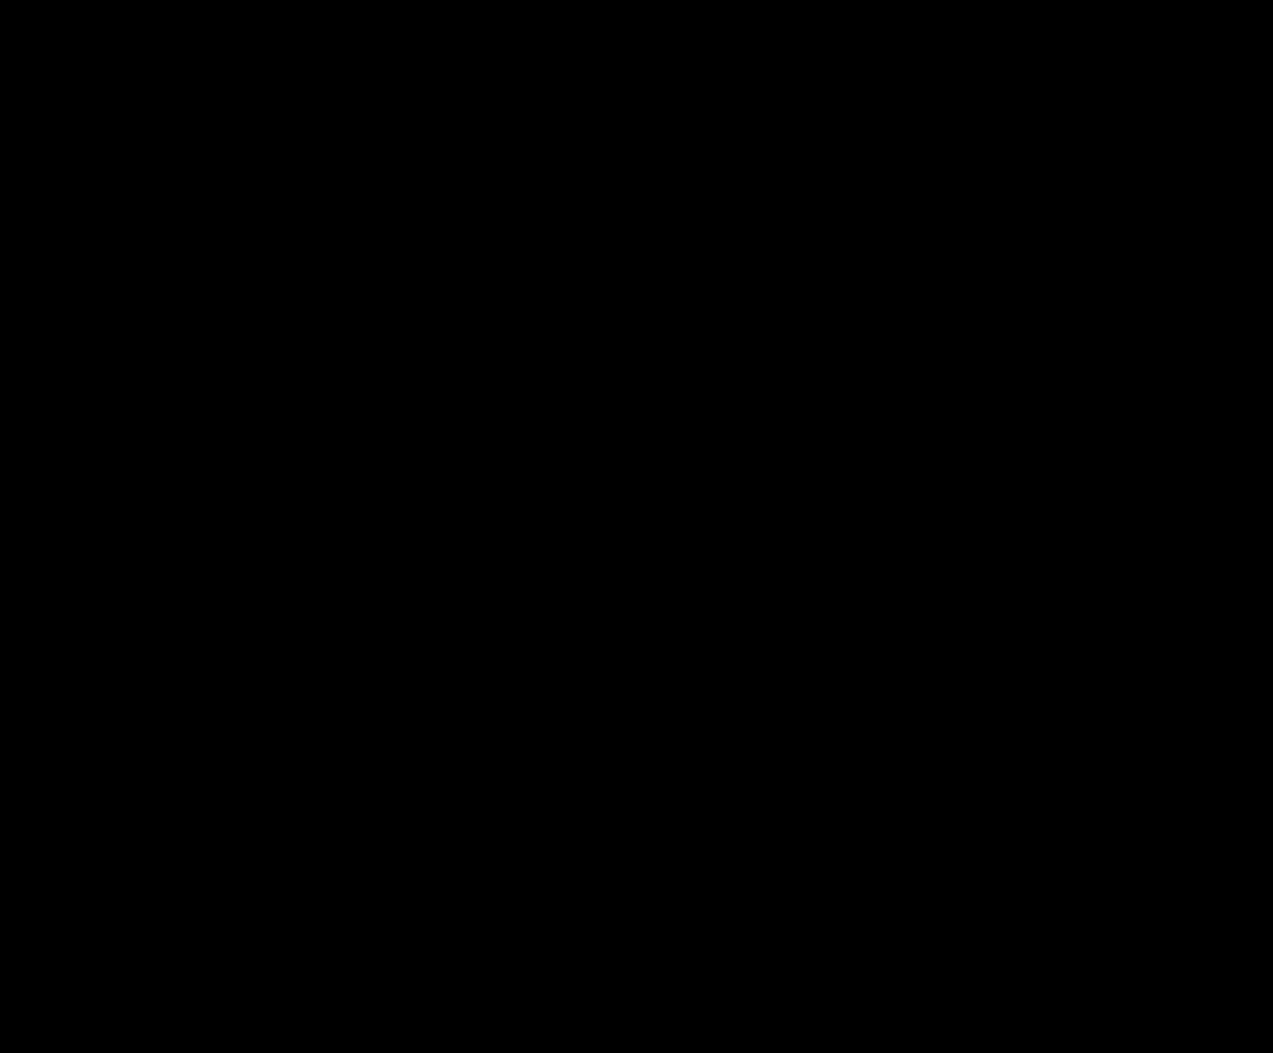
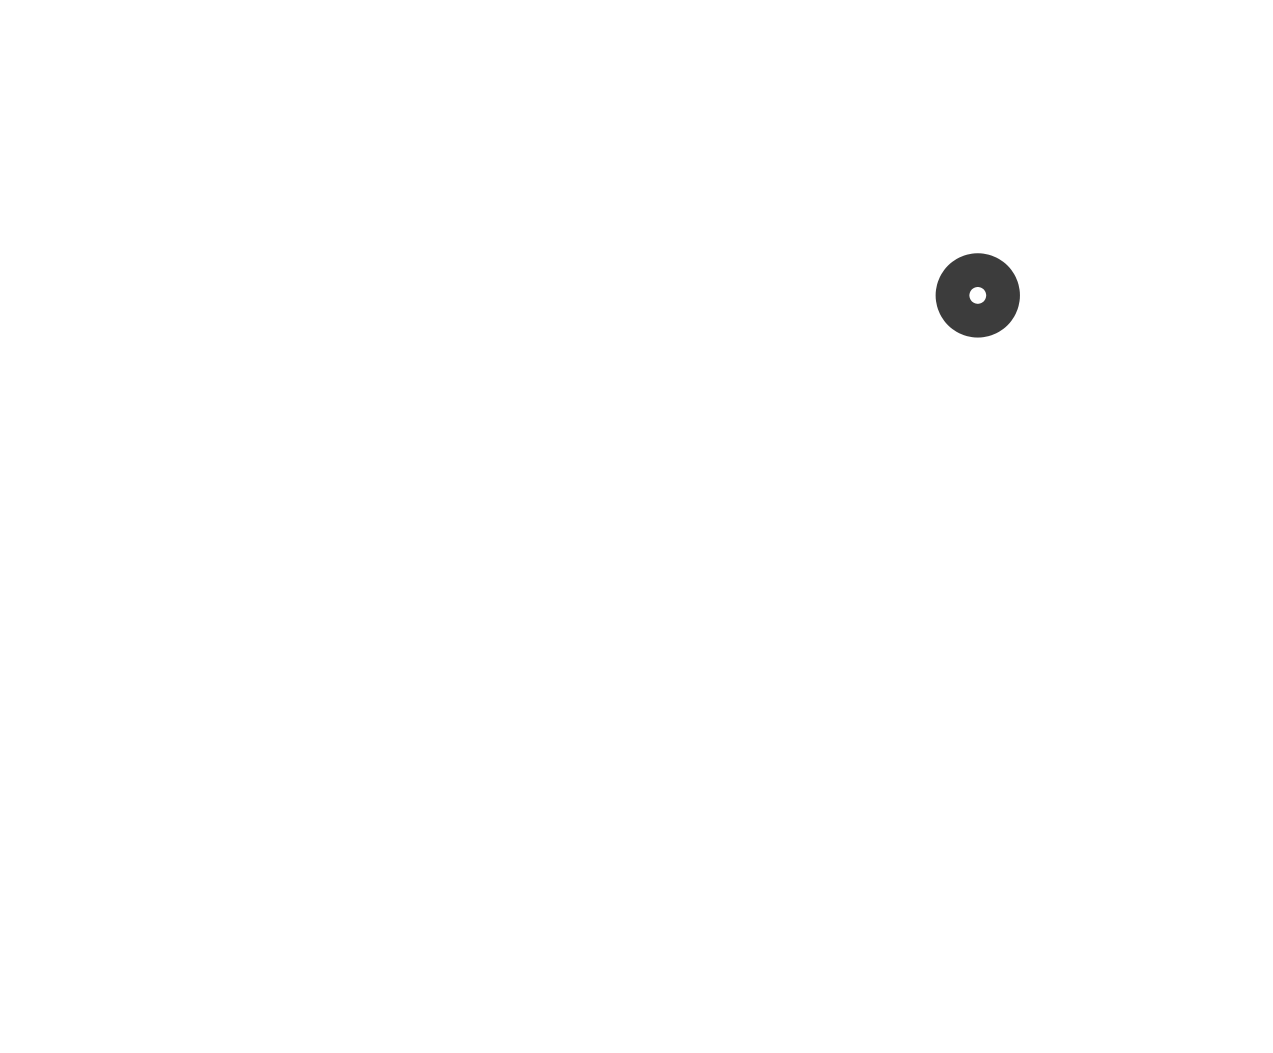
part: none -> (977, 295)

